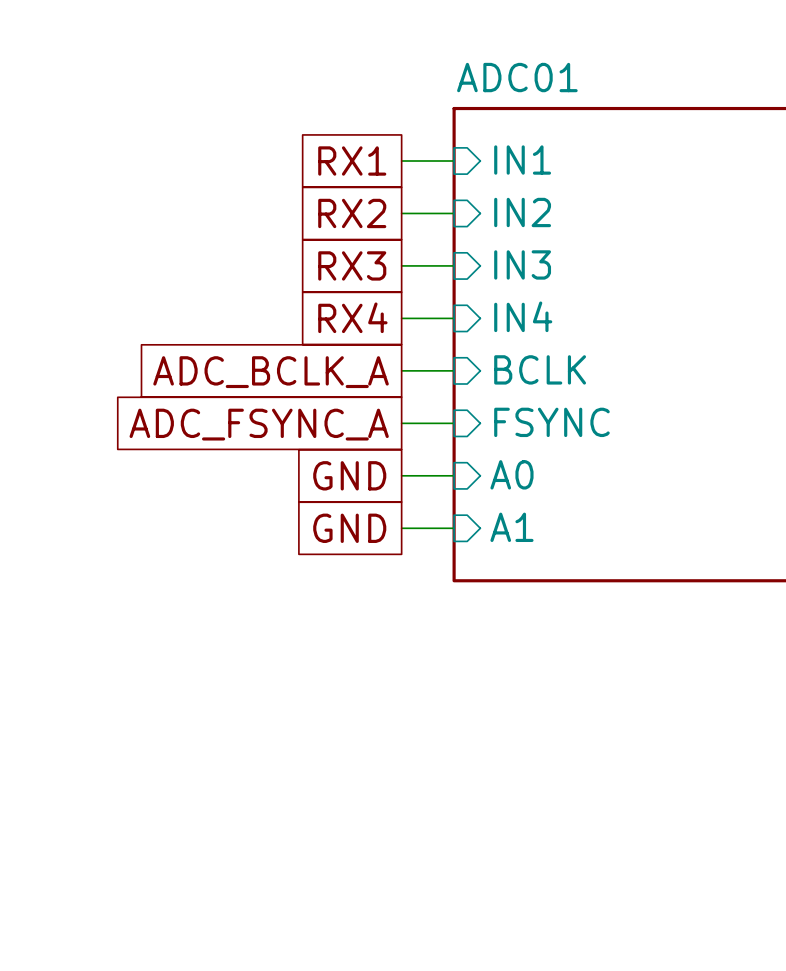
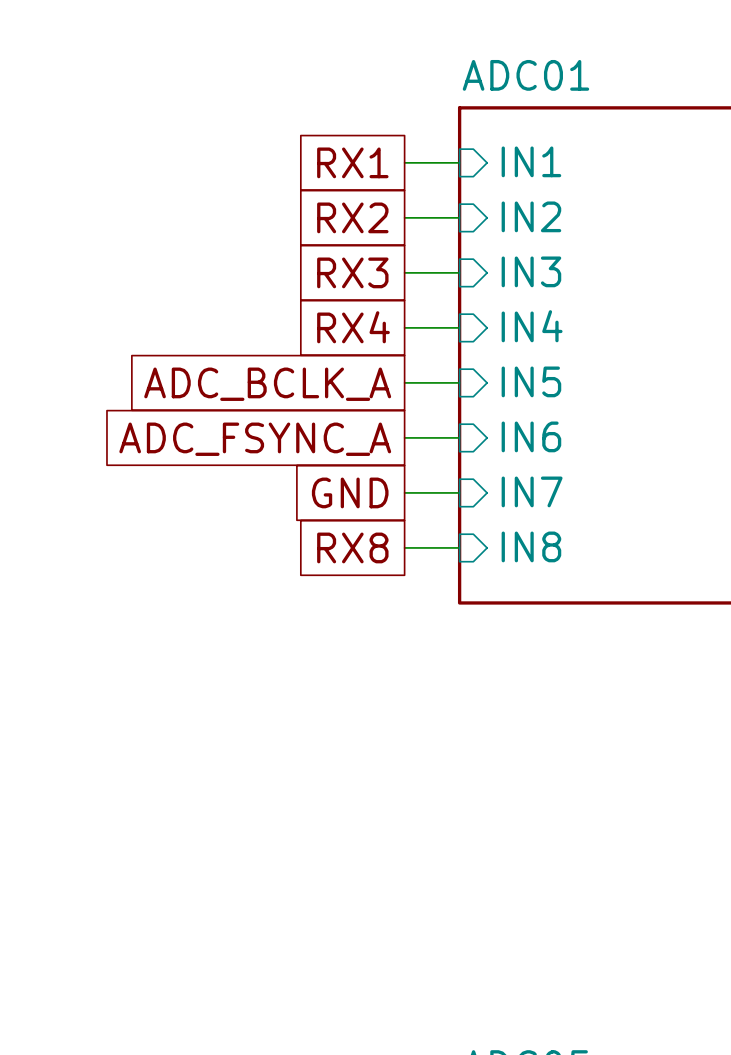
sheet pin: BCLK (540, 369) -> IN5 (531, 381)
sheet pin: FSYNC (551, 422) -> IN6 (531, 436)
sheet pin: A0 (511, 474) -> IN7 (532, 491)
sheet pin: A1 (511, 527) -> IN8 (531, 546)
global label: GND (349, 528) -> RX8 (352, 547)

